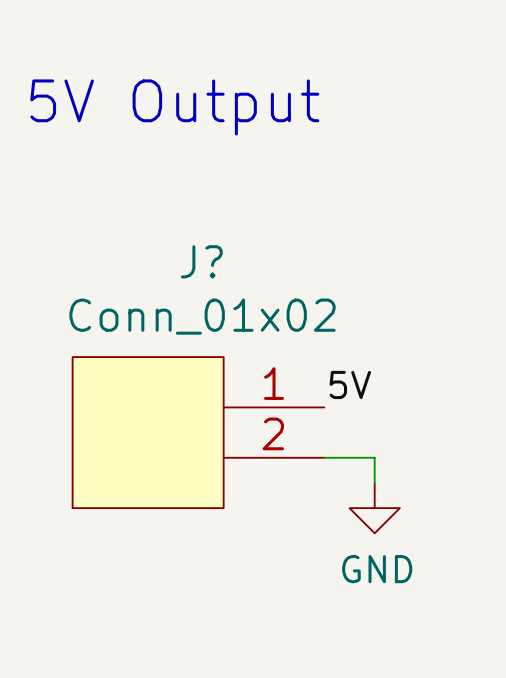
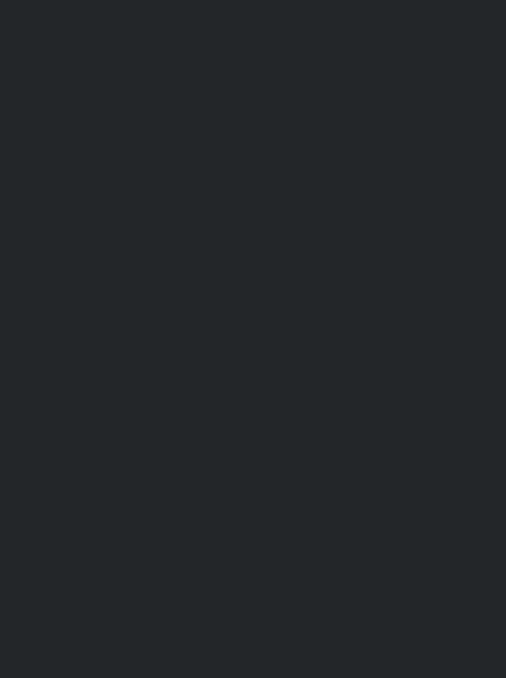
text: 5V Output (174, 107) -> none
label: 5V (350, 384) -> none
J?: Conn_01x02 (198, 432) -> none
wire: (324, 457) (374, 457) (374, 482) -> none
power symbol: GND (374, 508) -> none

